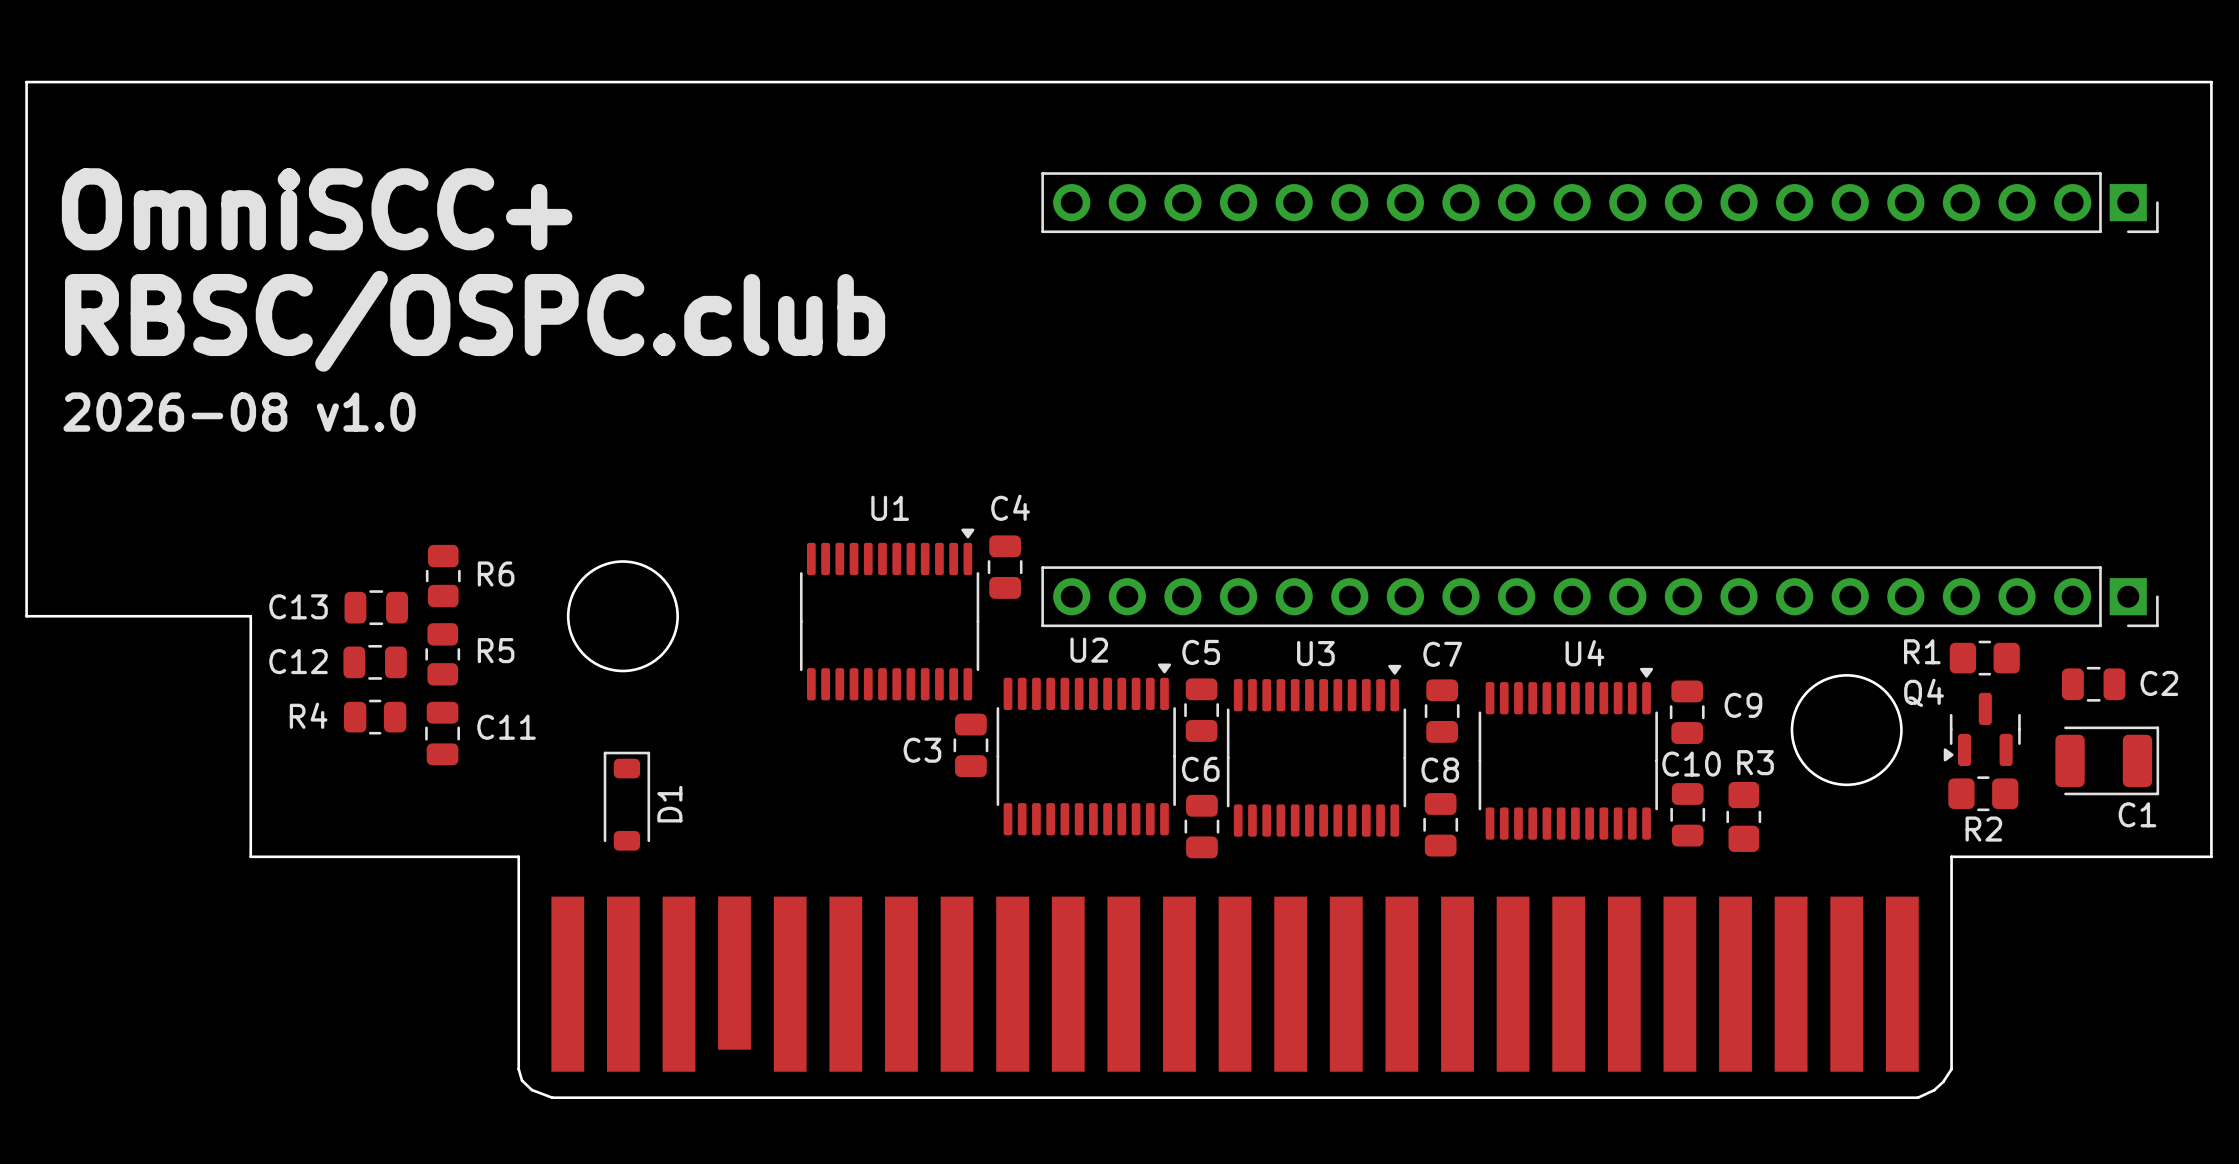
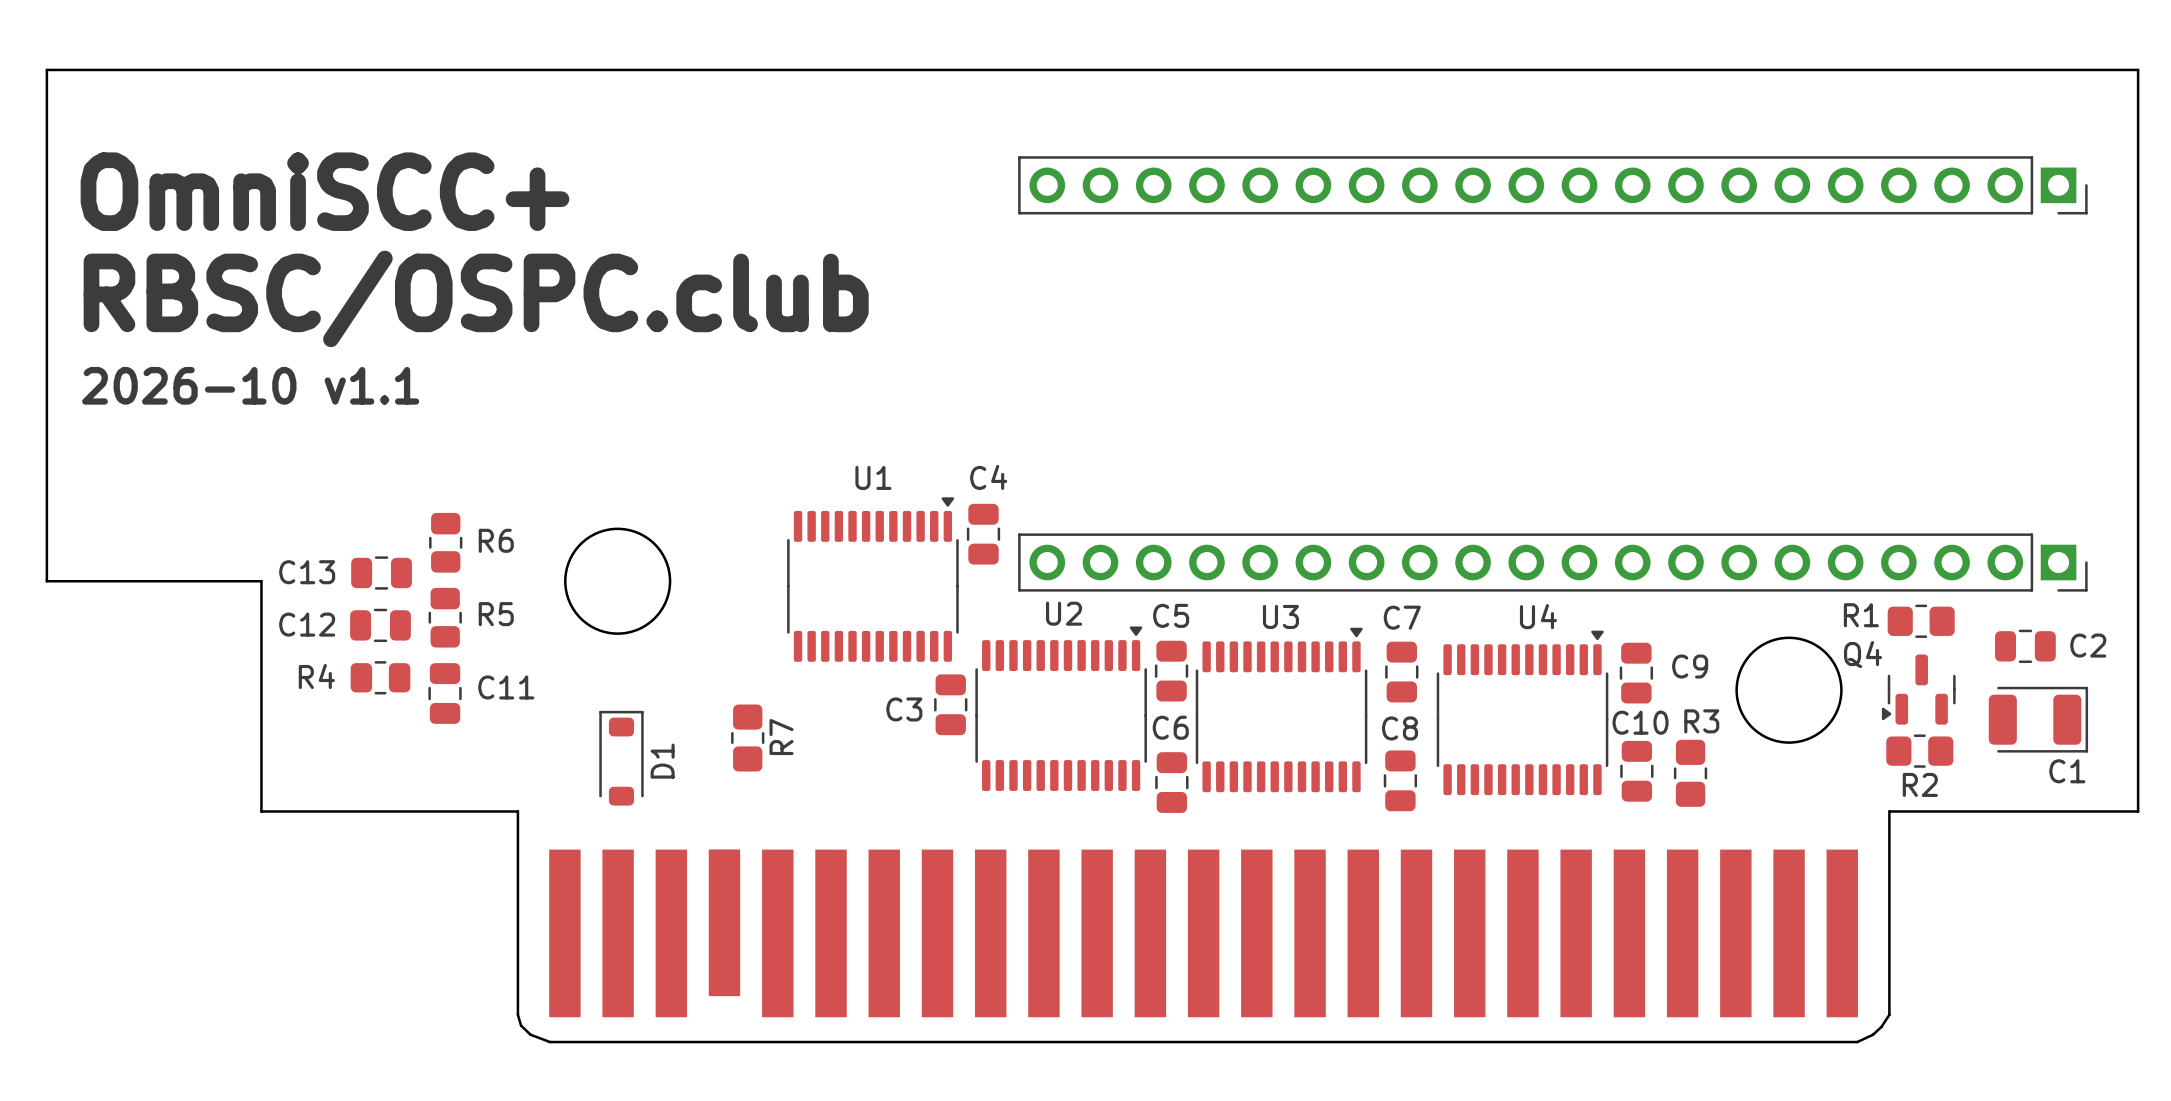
text: 2026-08 v1.0 (239, 412) -> 2026-10 v1.1 (250, 385)
R7: none -> (747, 738)

